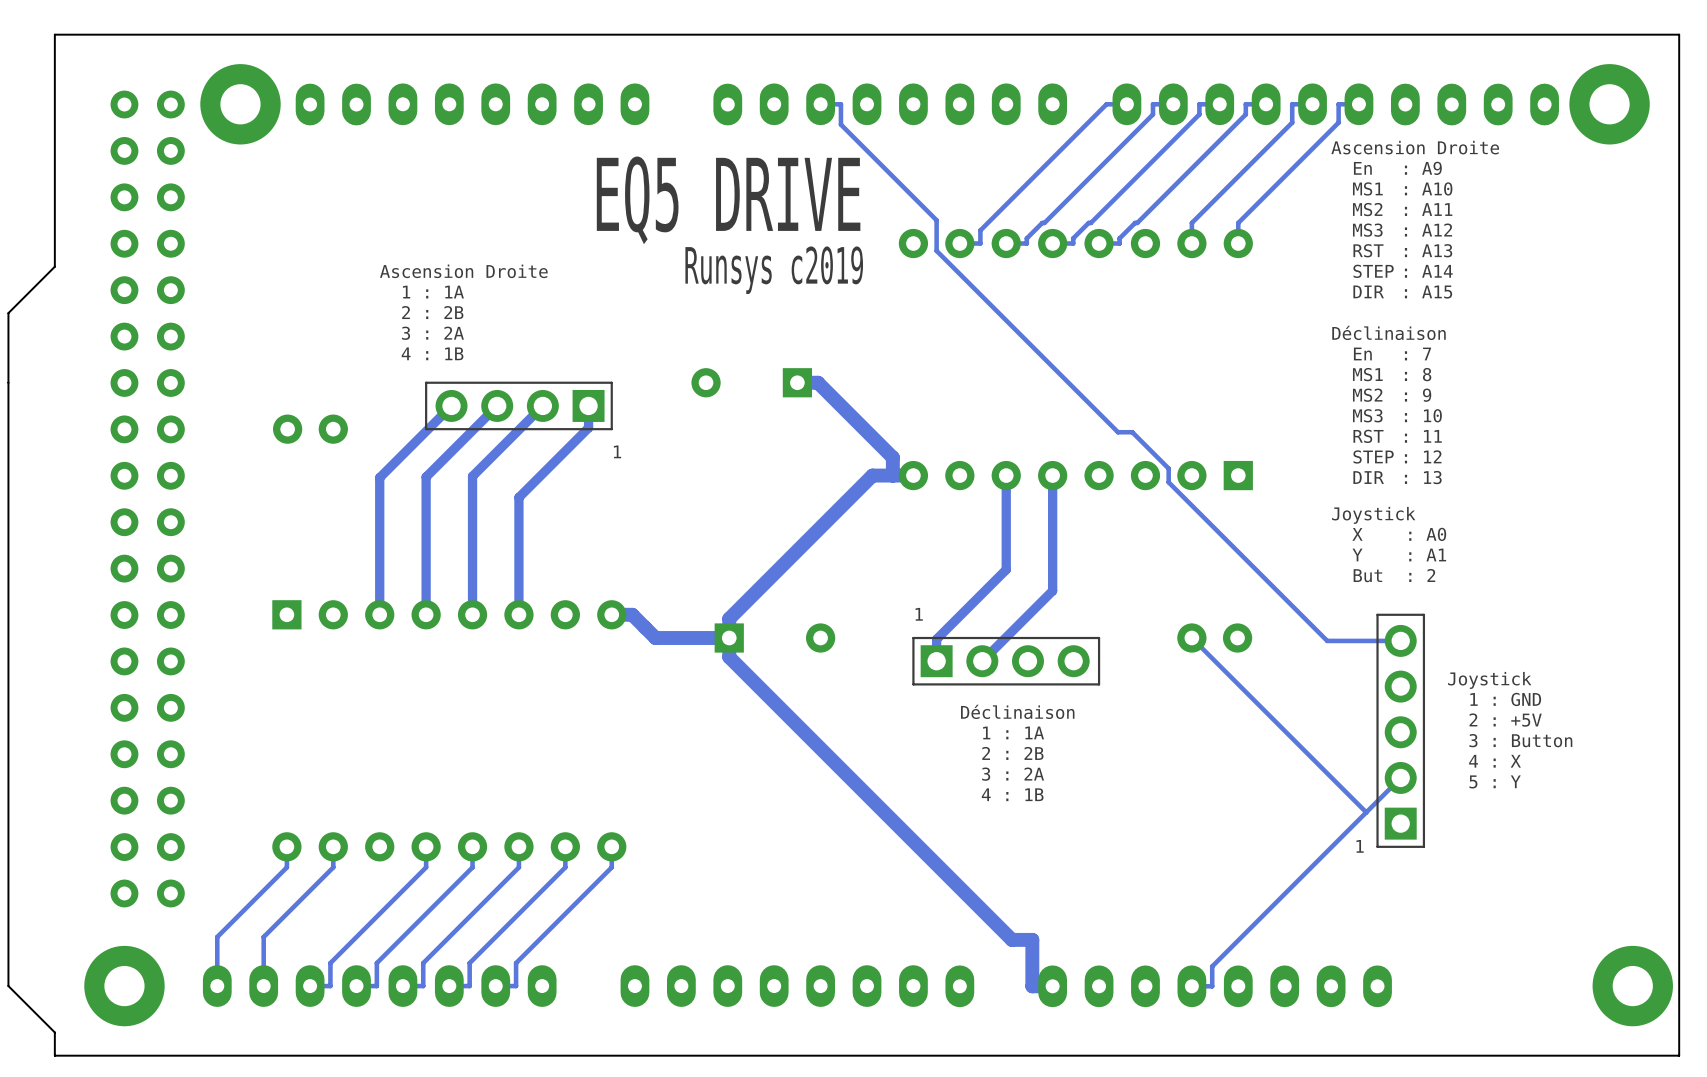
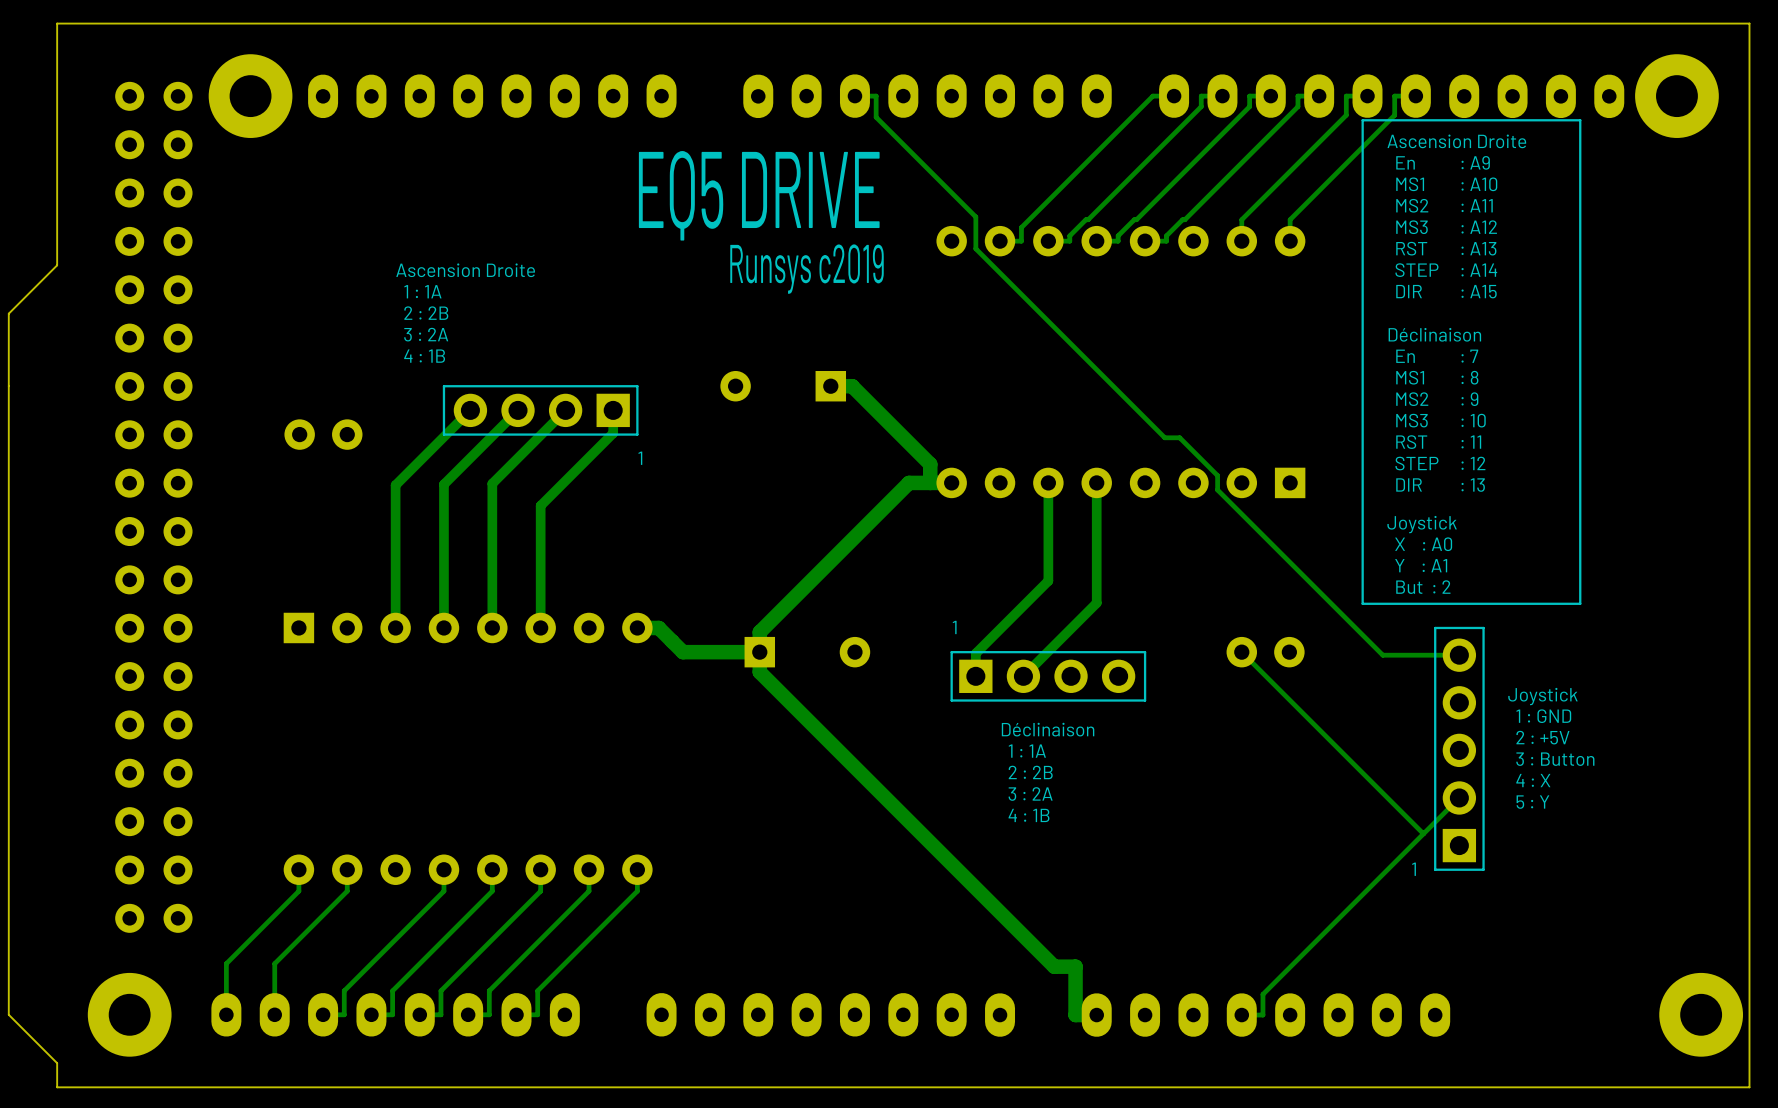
line: none -> (1580, 120) (1362, 120) (1362, 603) (1580, 603) (1580, 120)

